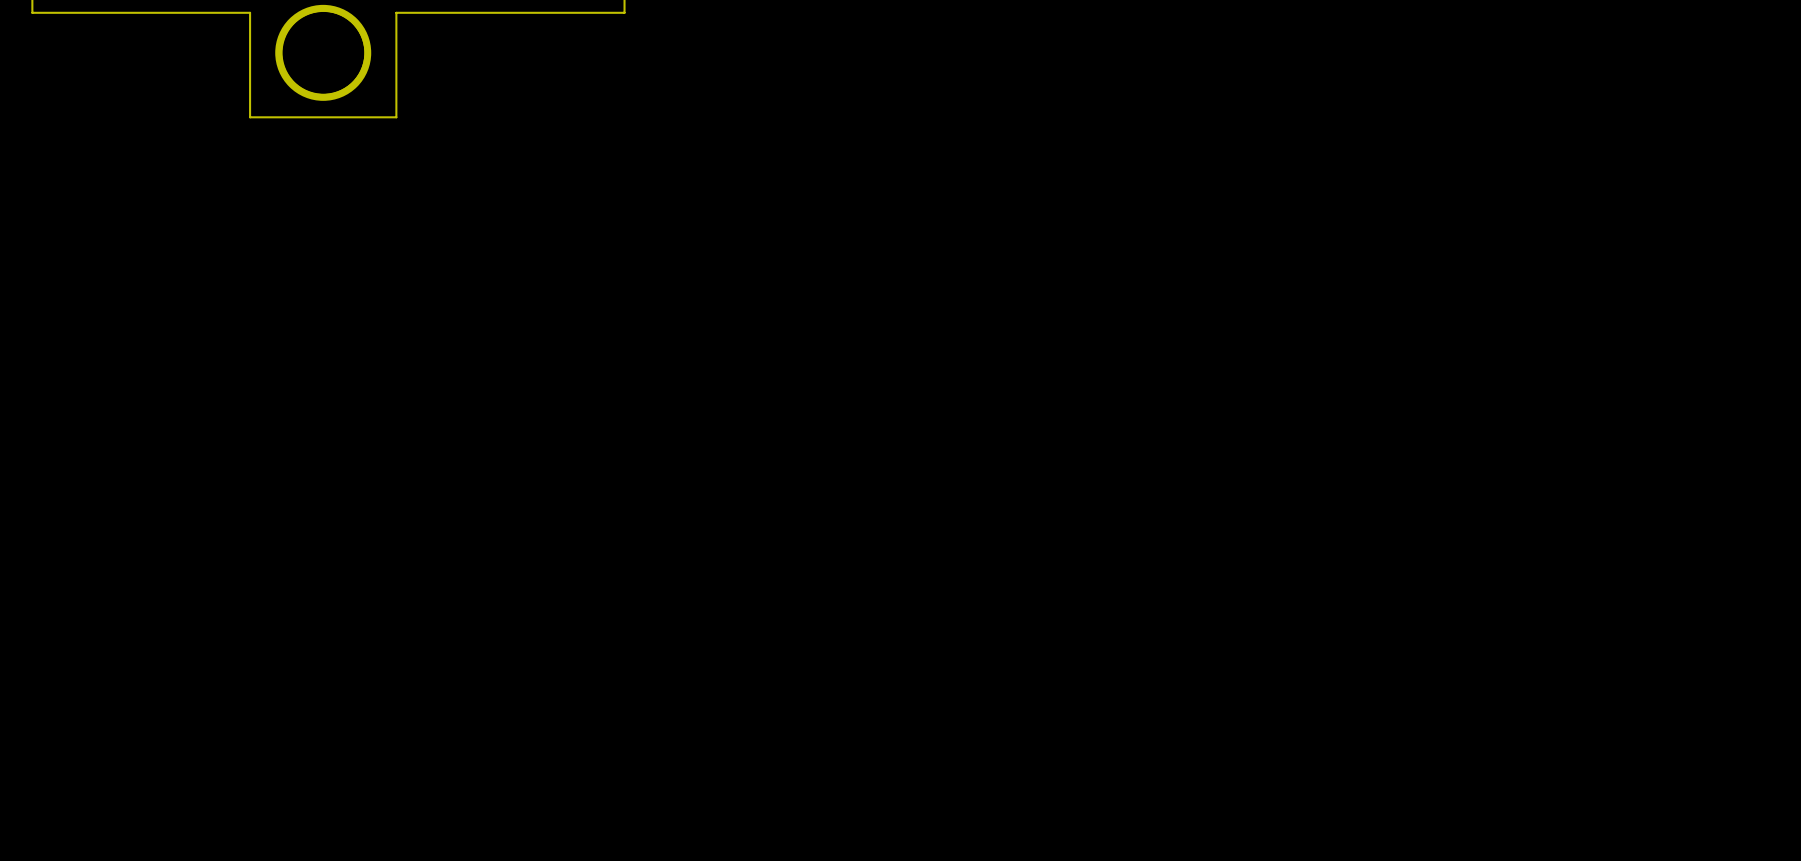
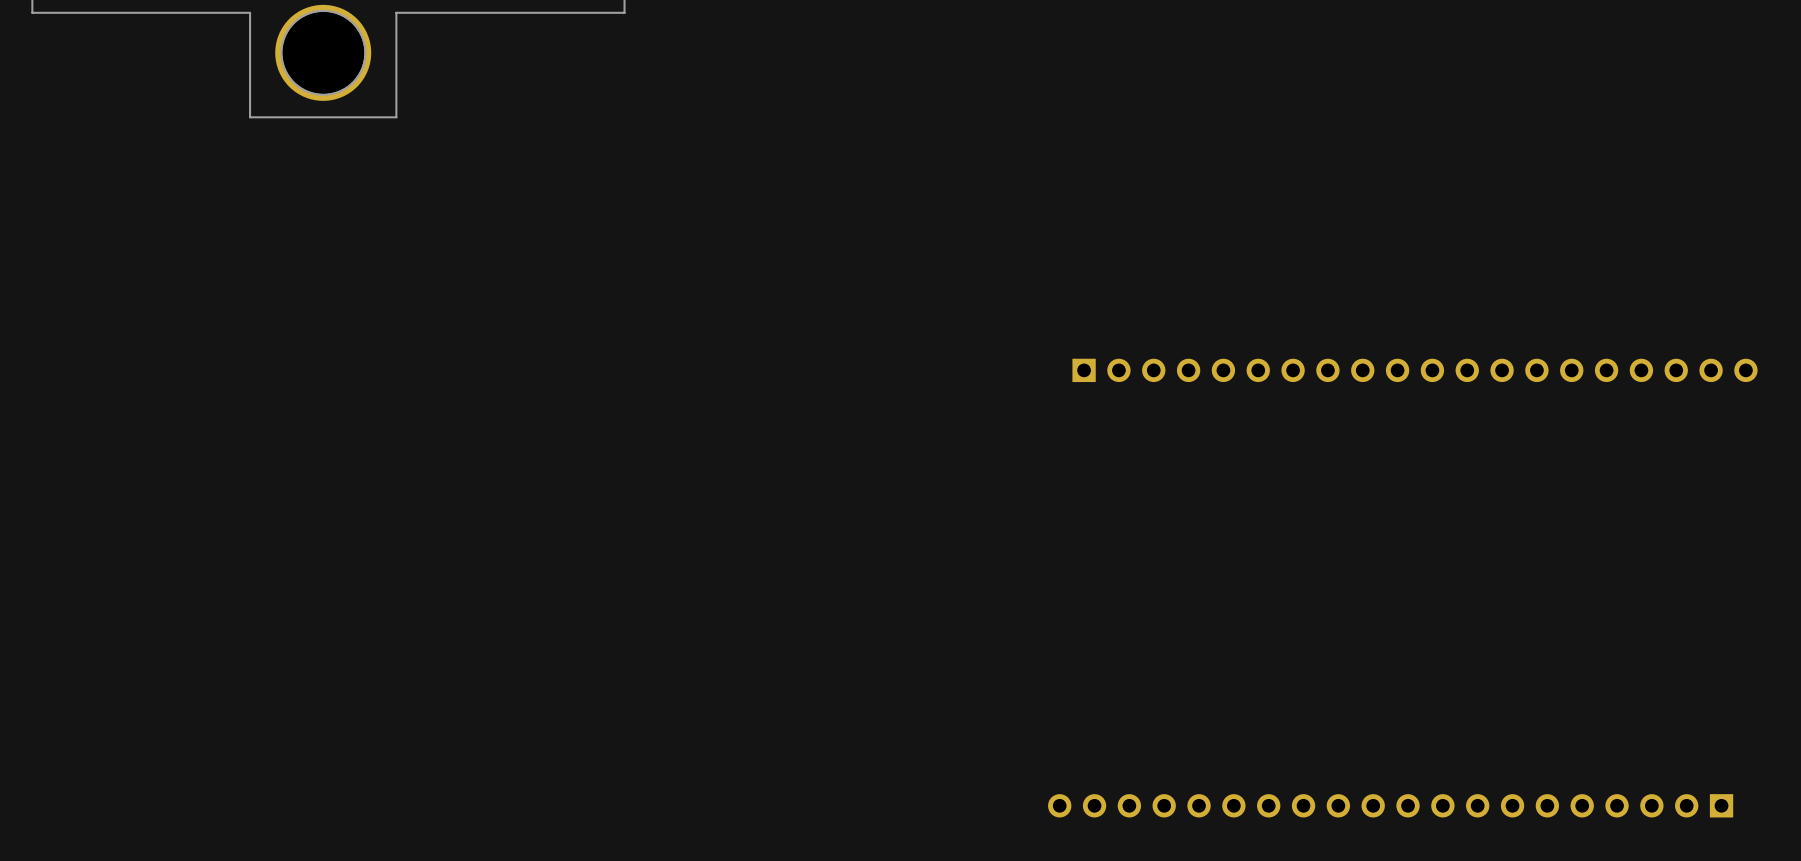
part: none -> (1415, 370)
part: none -> (1390, 805)

